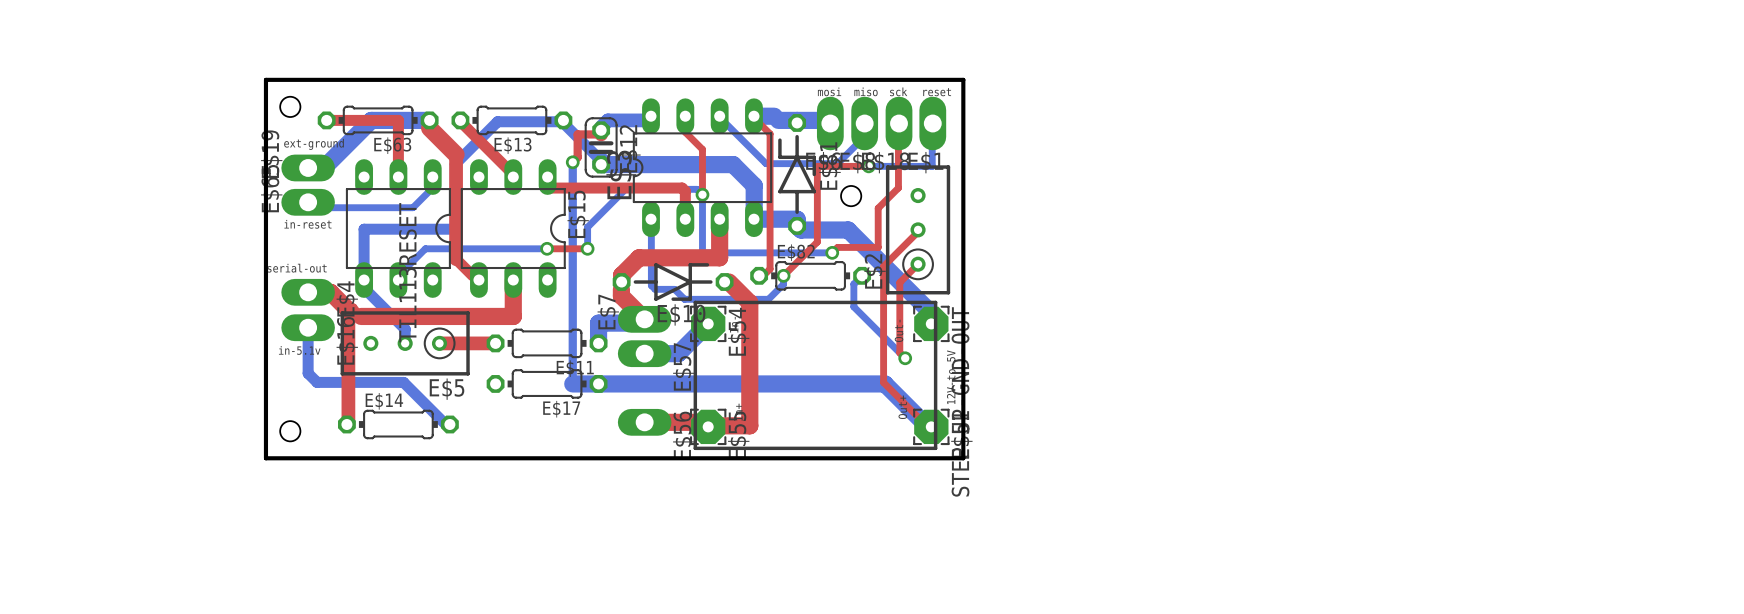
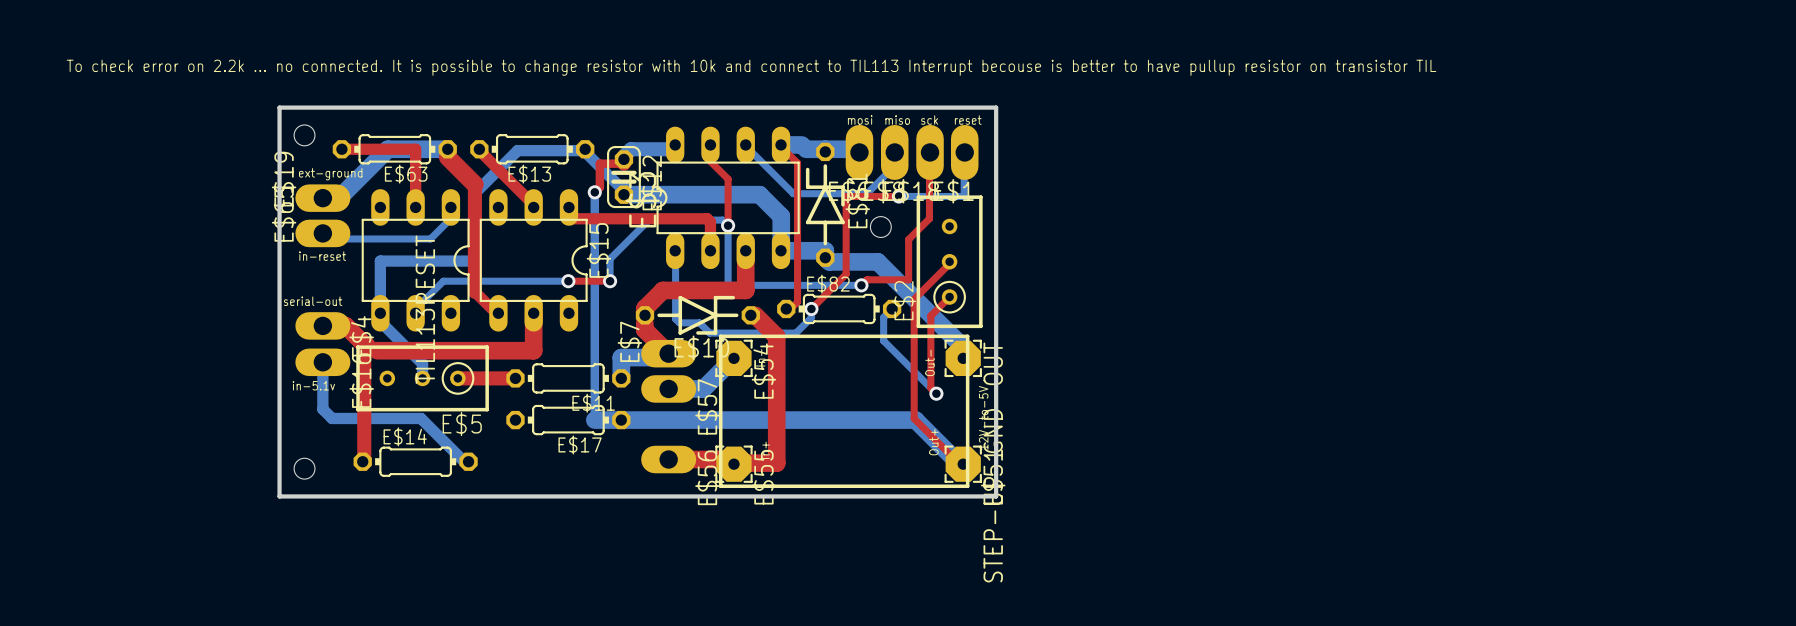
text: none -> To check error on 2.2k ... no connected. It is possible to change resistor with 10k and connect to TIL113 Interrupt becouse is better to have pullup resistor on transistor TIL (751, 67)

